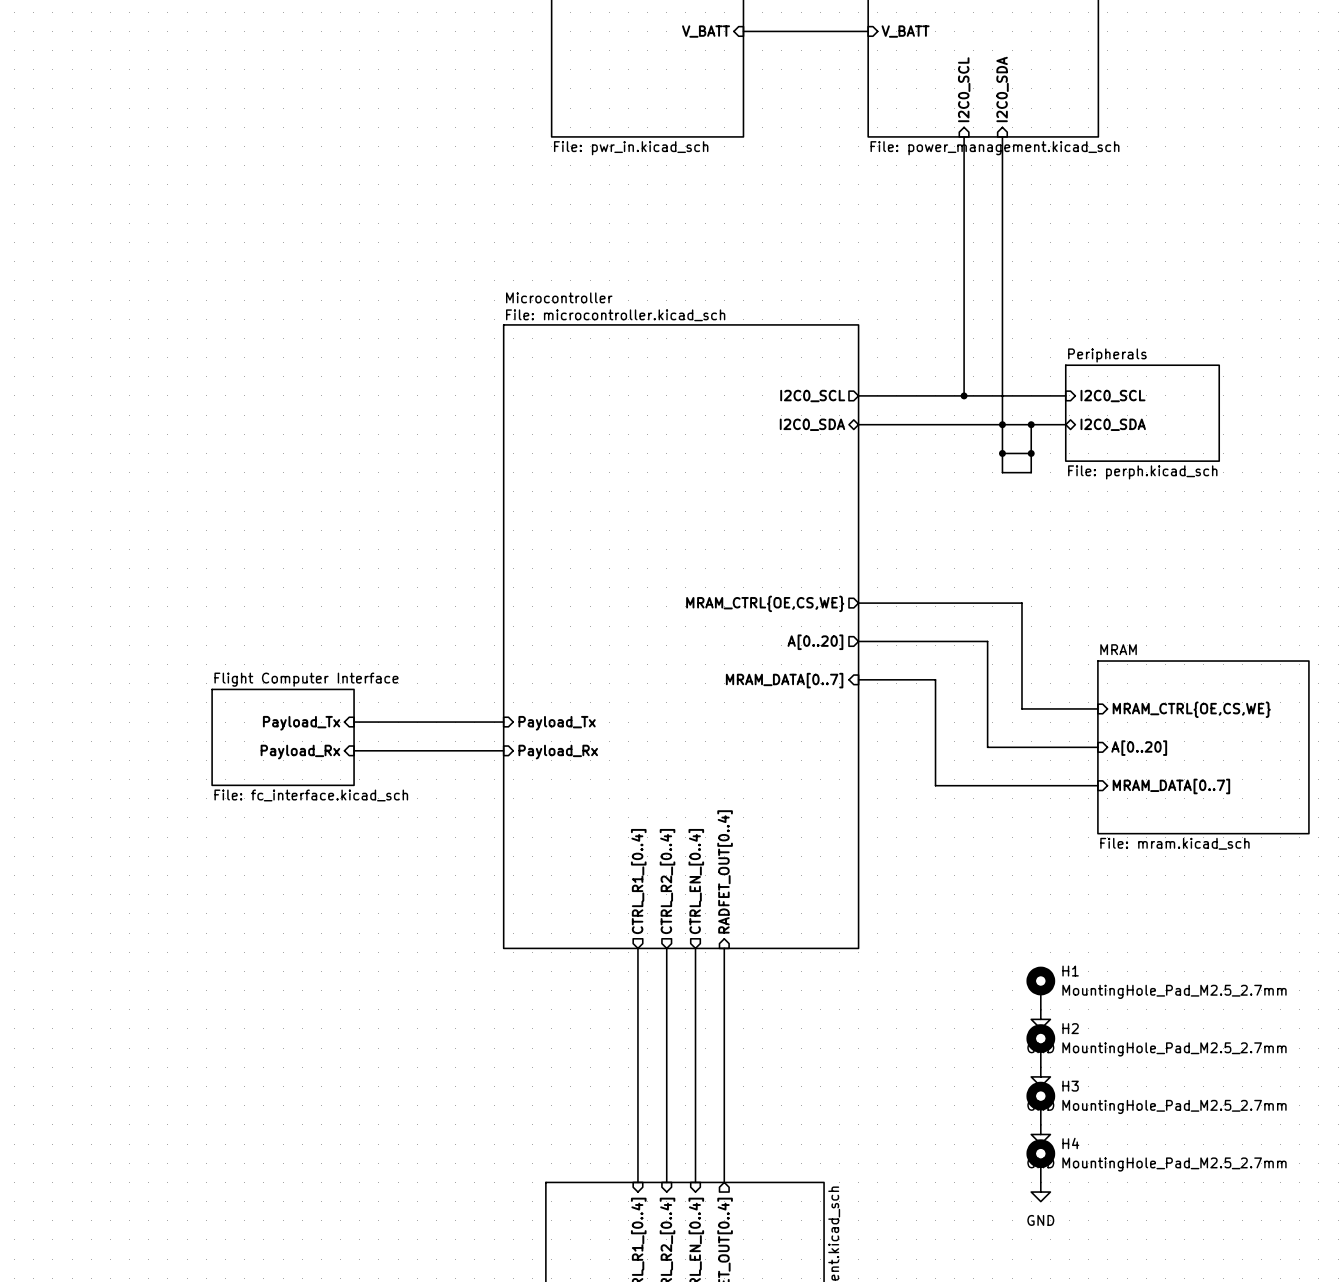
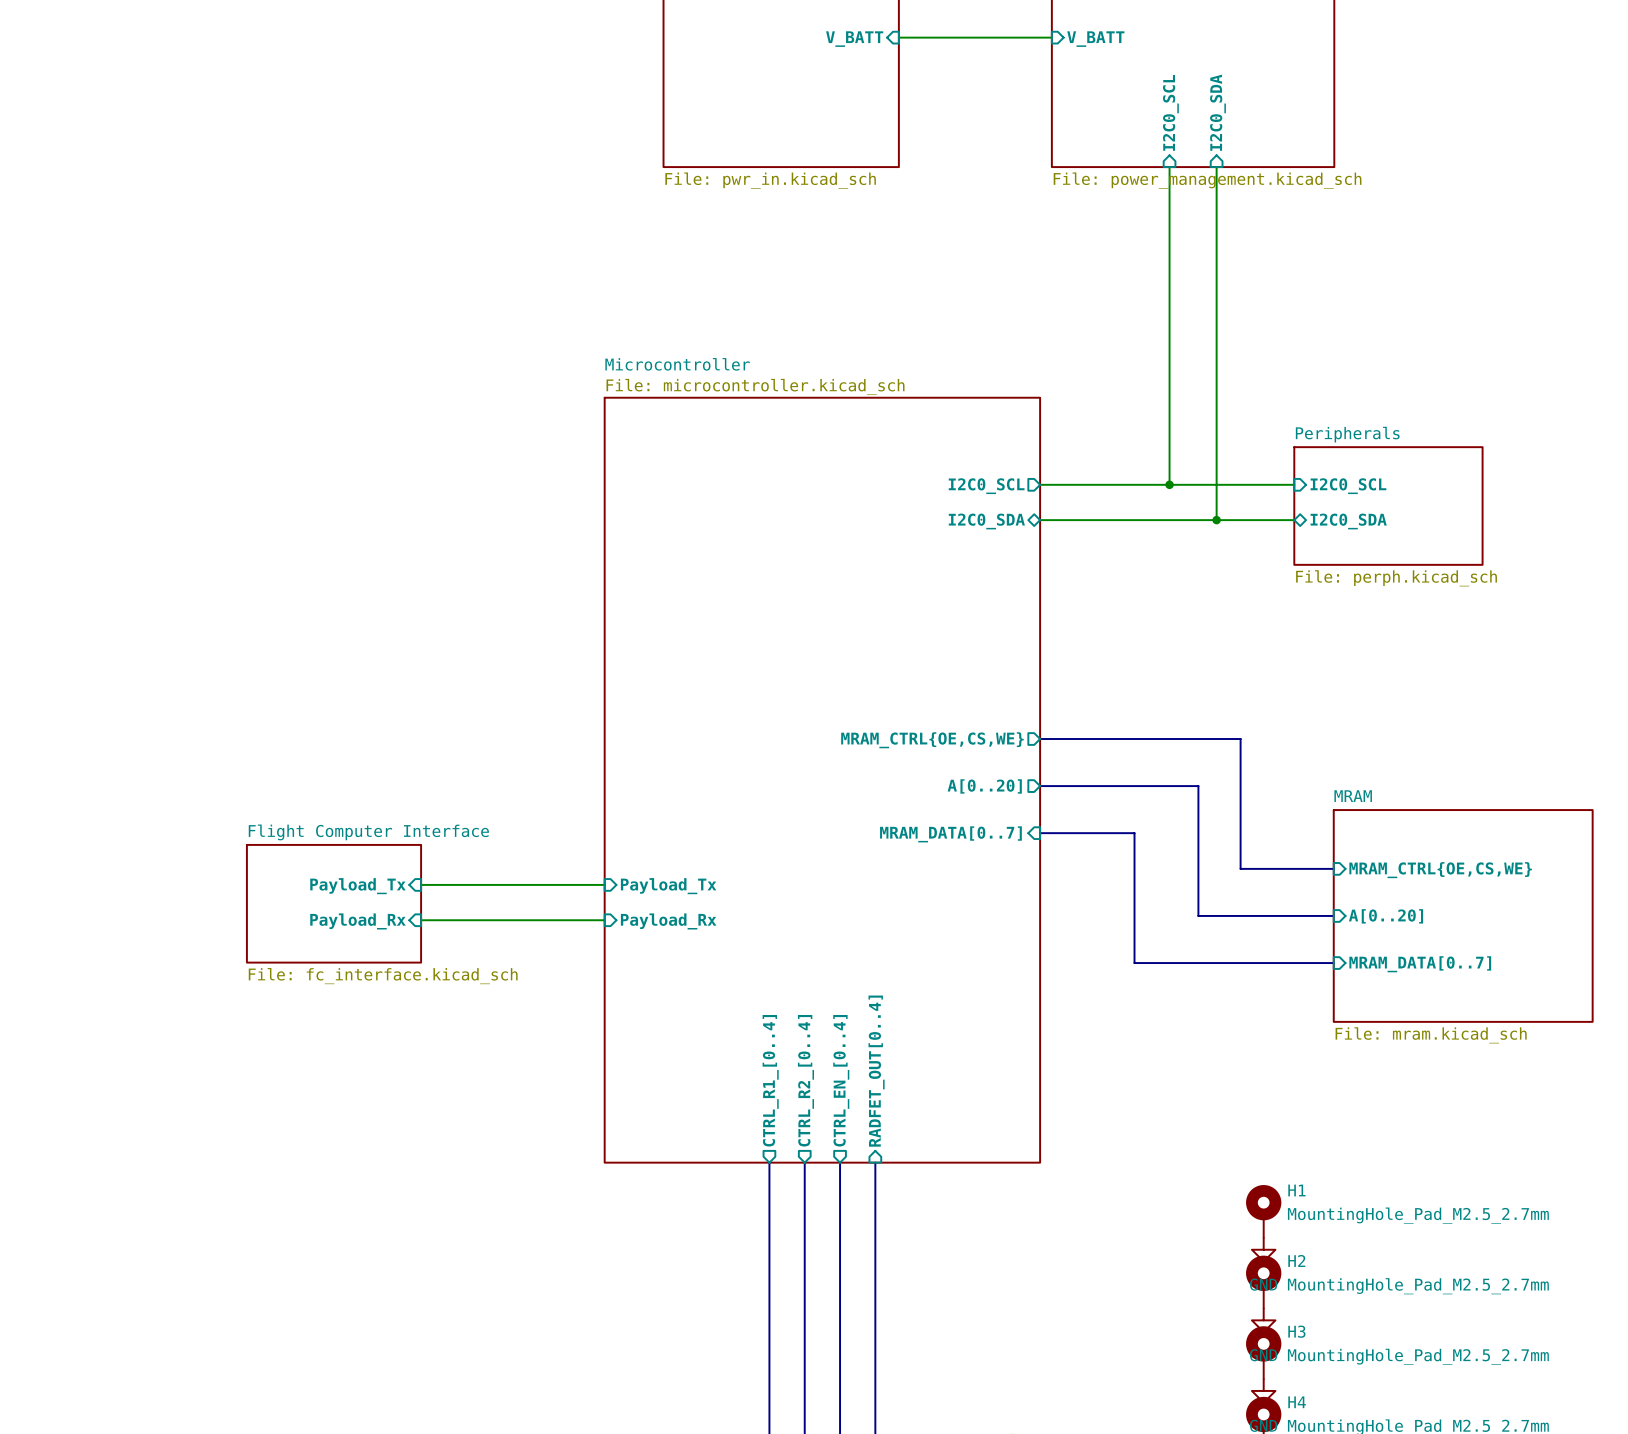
wire: (1002, 424) (1002, 472) (1031, 472) (1031, 424) -> none
junction: (1031, 424) -> none
wire: (1002, 453) (1031, 453) -> none
junction: (1002, 453) -> none
junction: (1031, 453) -> none

